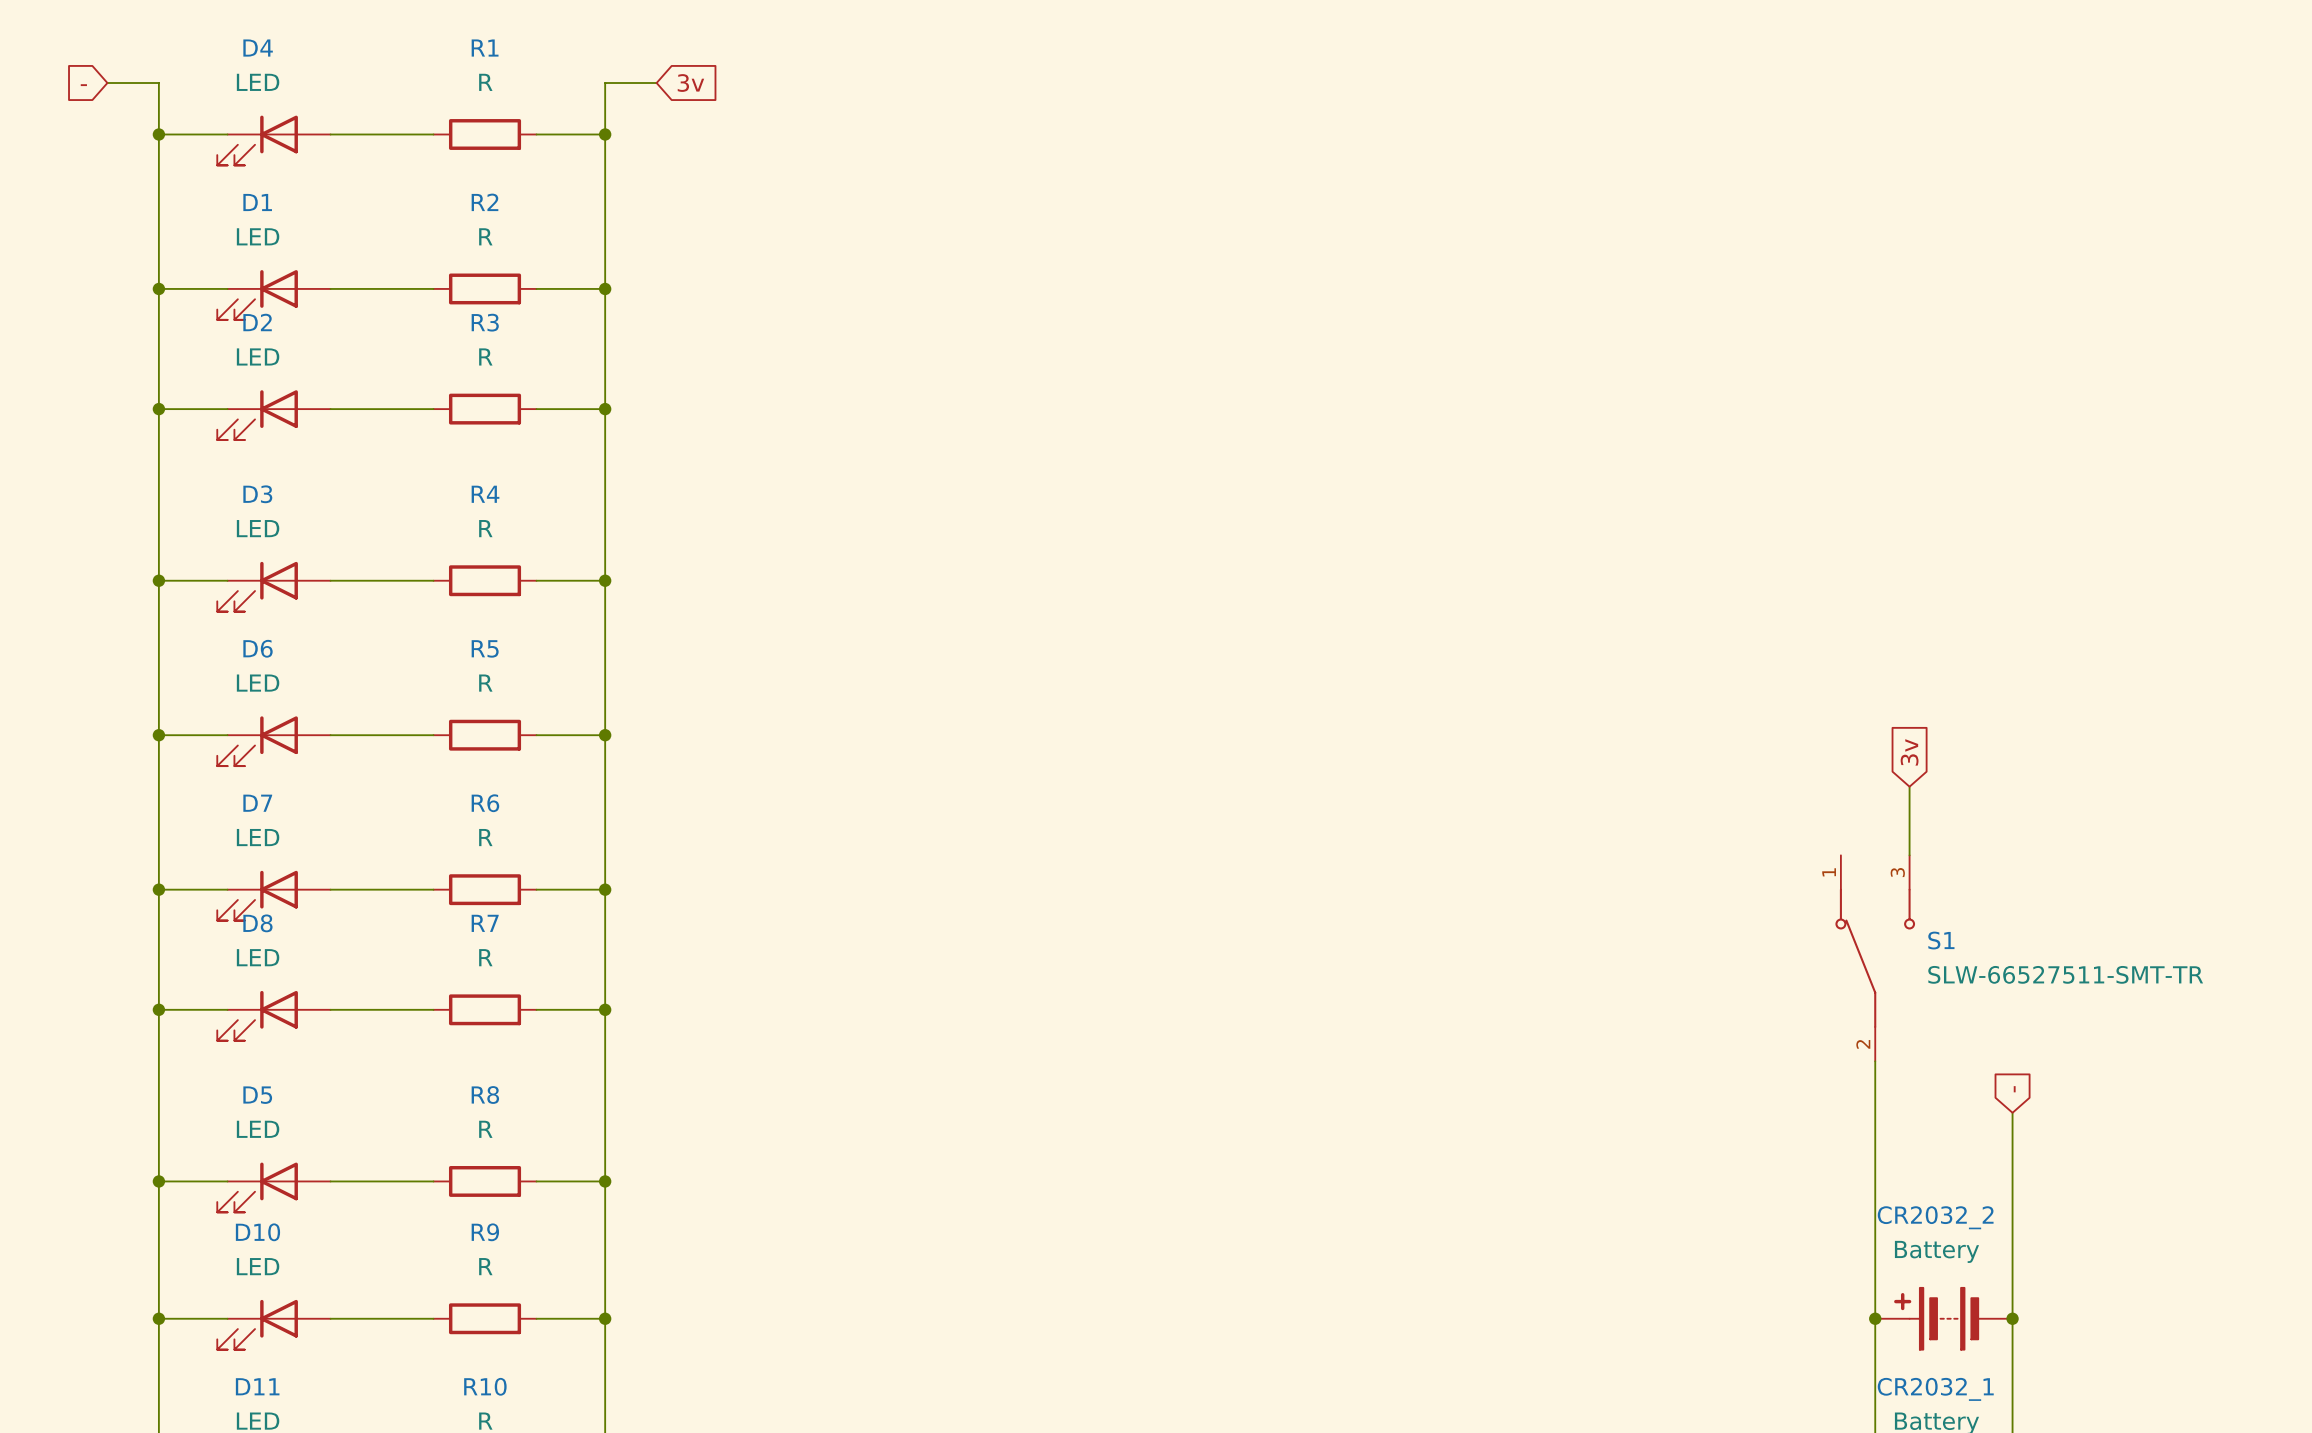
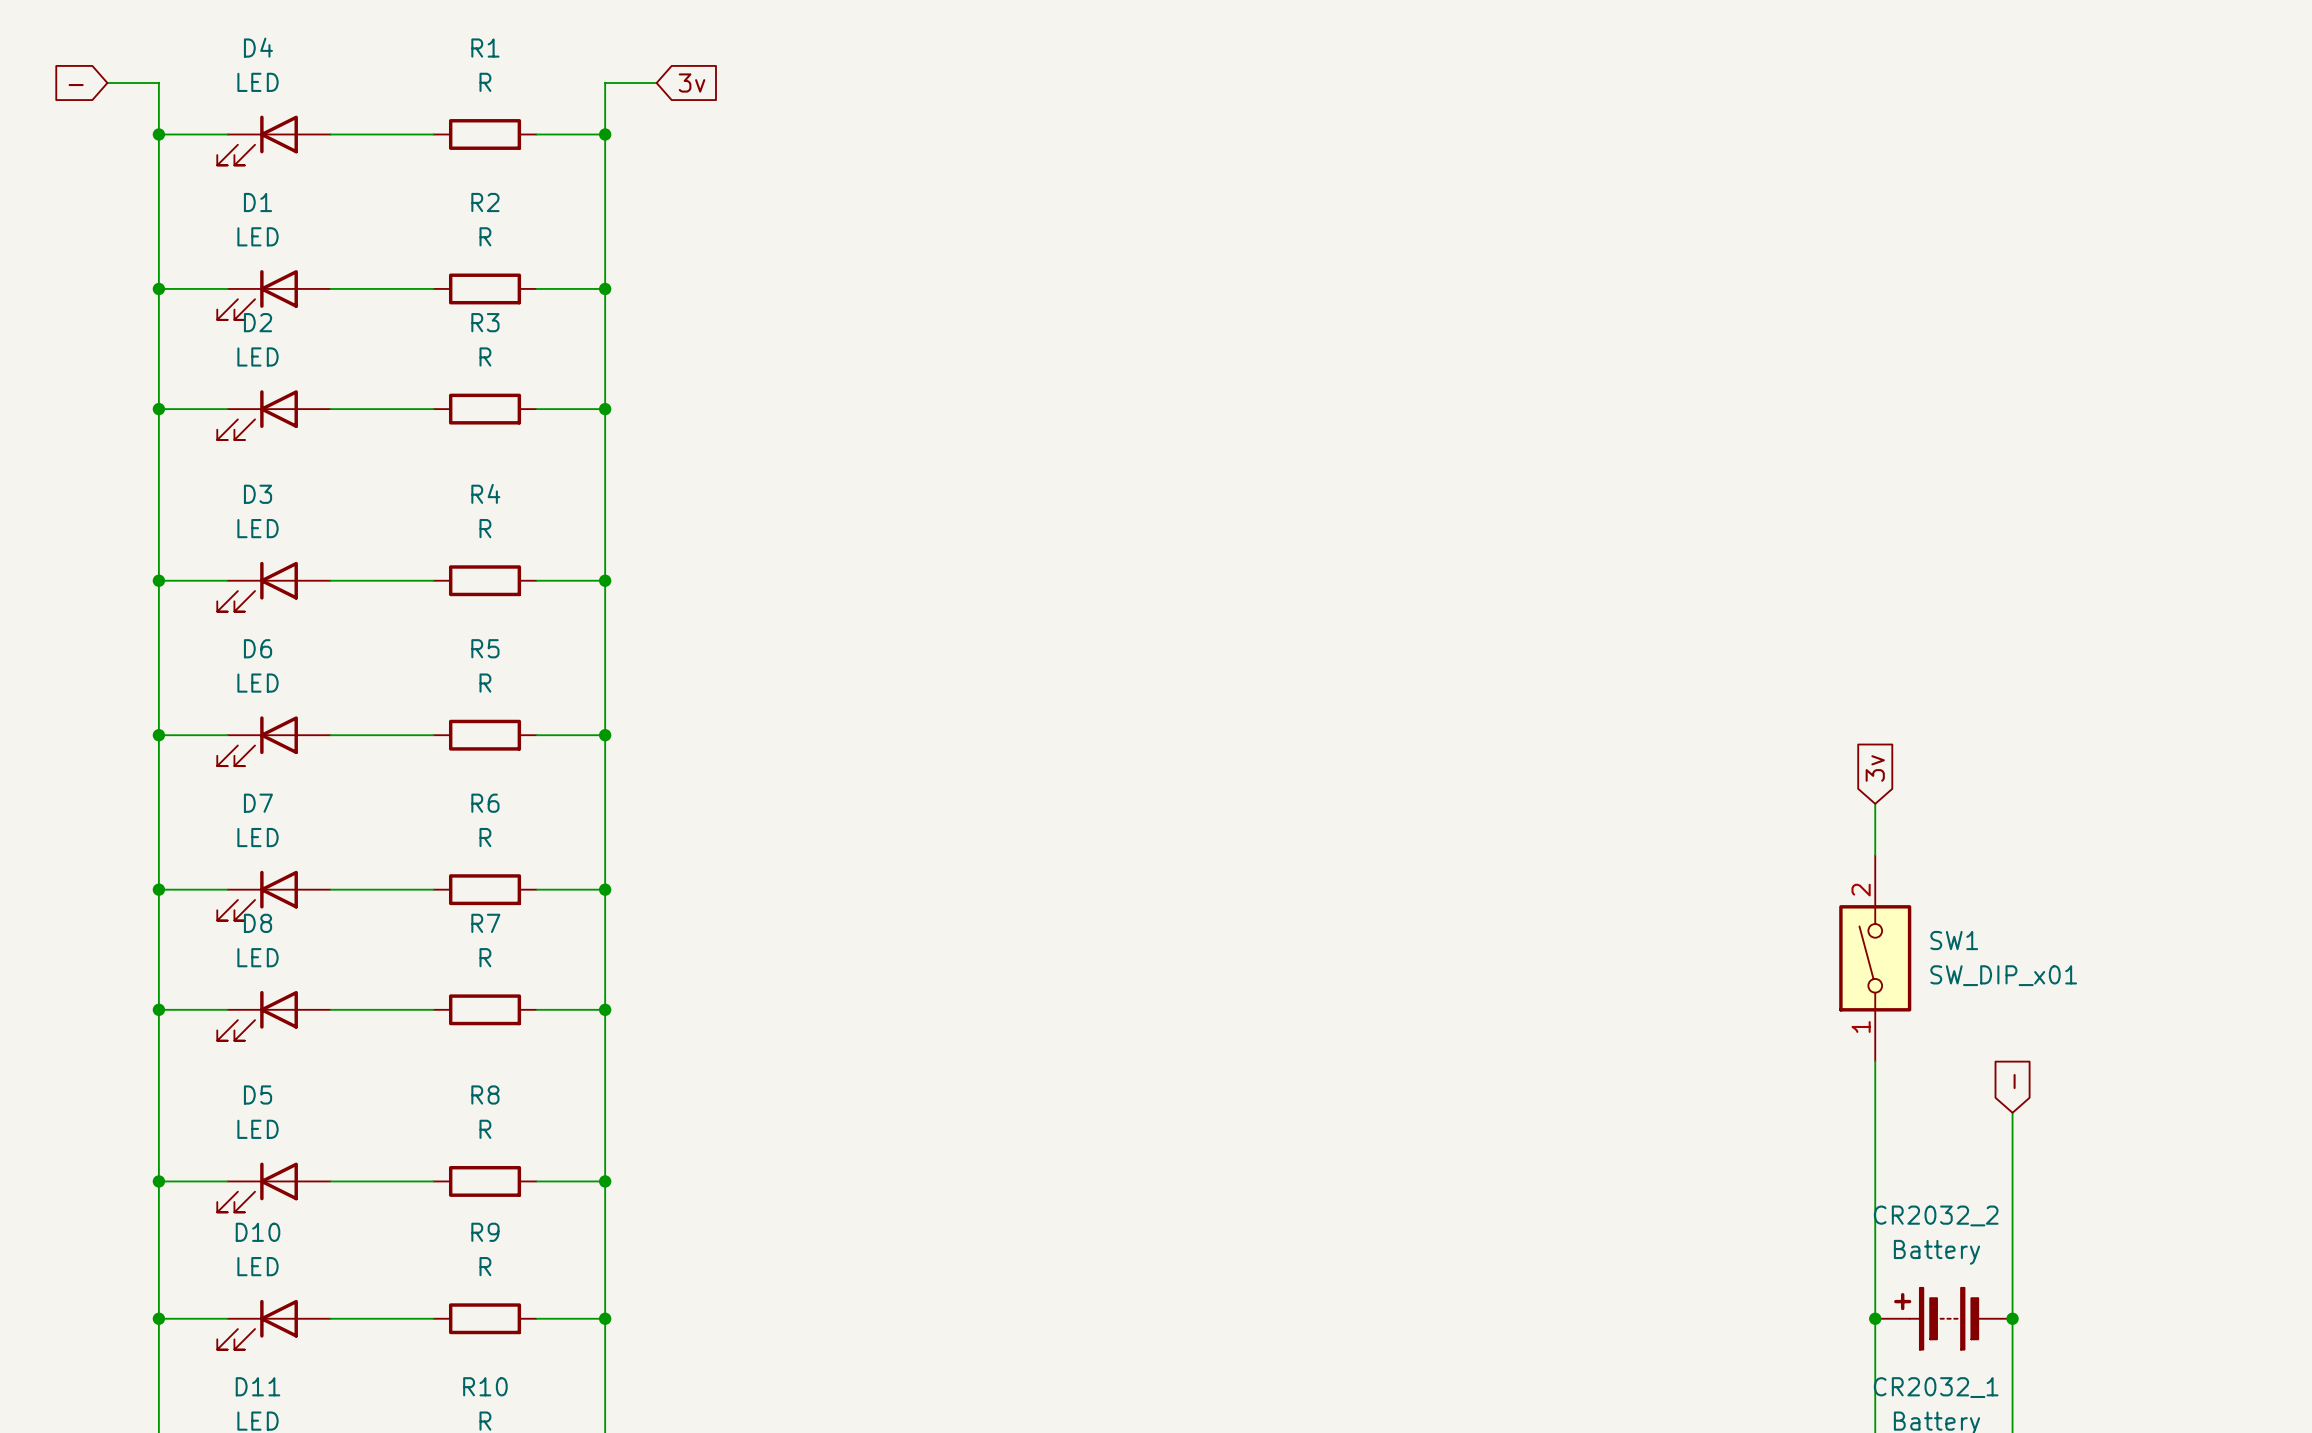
global label position: 3v (1909, 752) -> 3v (1875, 768)
wire: (1909, 786) (1909, 855) -> none
wire: none -> (1875, 803) (1875, 855)
S1: SLW-66527511-SMT-TR (1875, 958) -> none
SW1: none -> SW_DIP_x01 (1875, 958)

